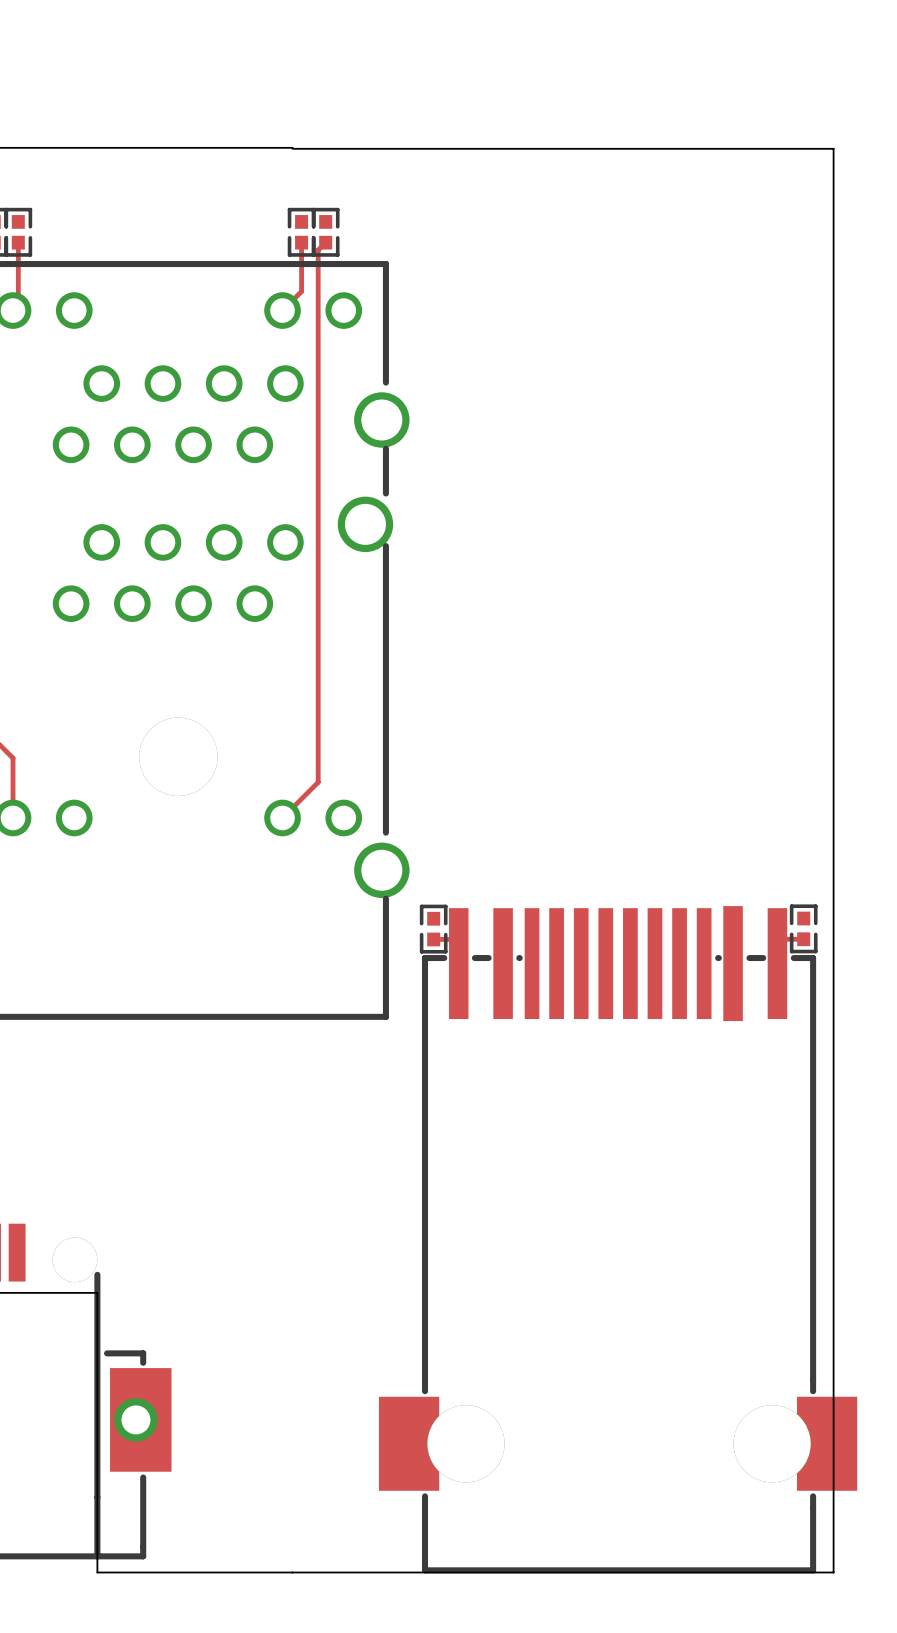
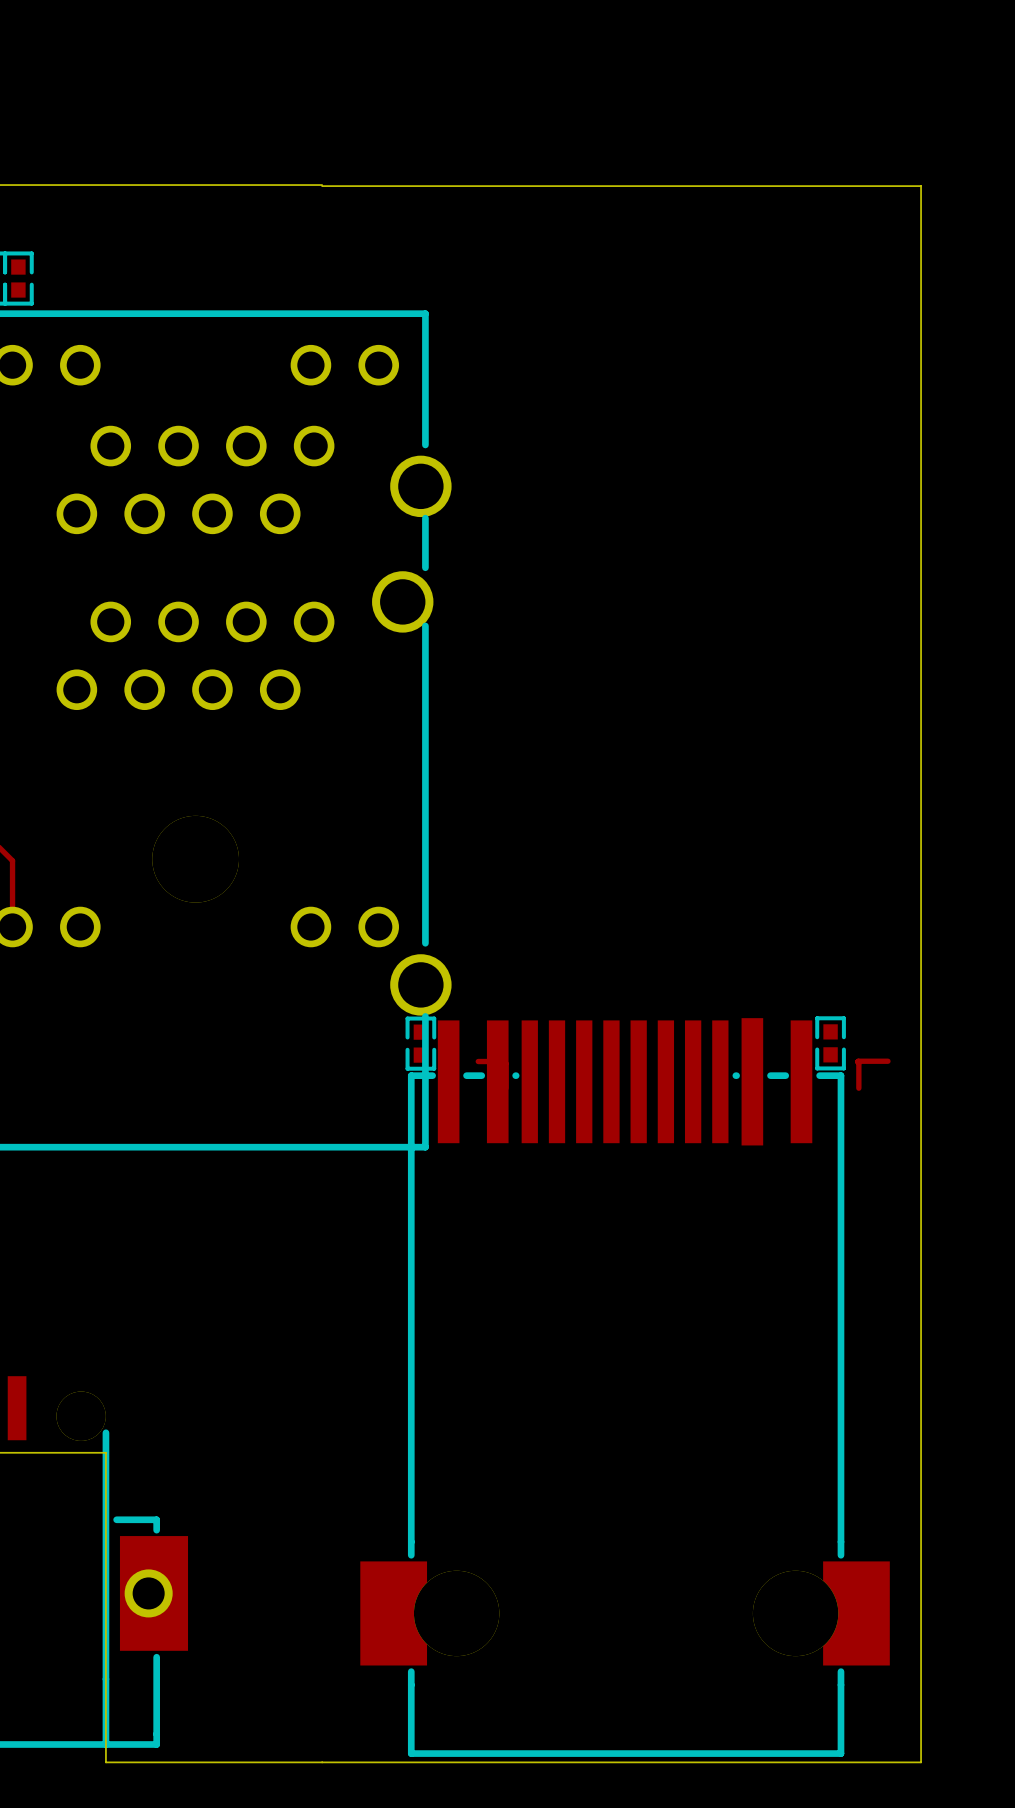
part: (301, 232) -> none
part: (325, 232) -> none
top track: (18, 242) (18, 305) (13, 310) -> none
top track: (301, 242) (301, 291) (282, 310) -> none
top track: (325, 242) (318, 250) (318, 782) (282, 817) -> none
part position: (803, 928) -> (830, 1043)
part position: (433, 929) -> (420, 1043)
part position: (618, 1239) -> (625, 1387)

